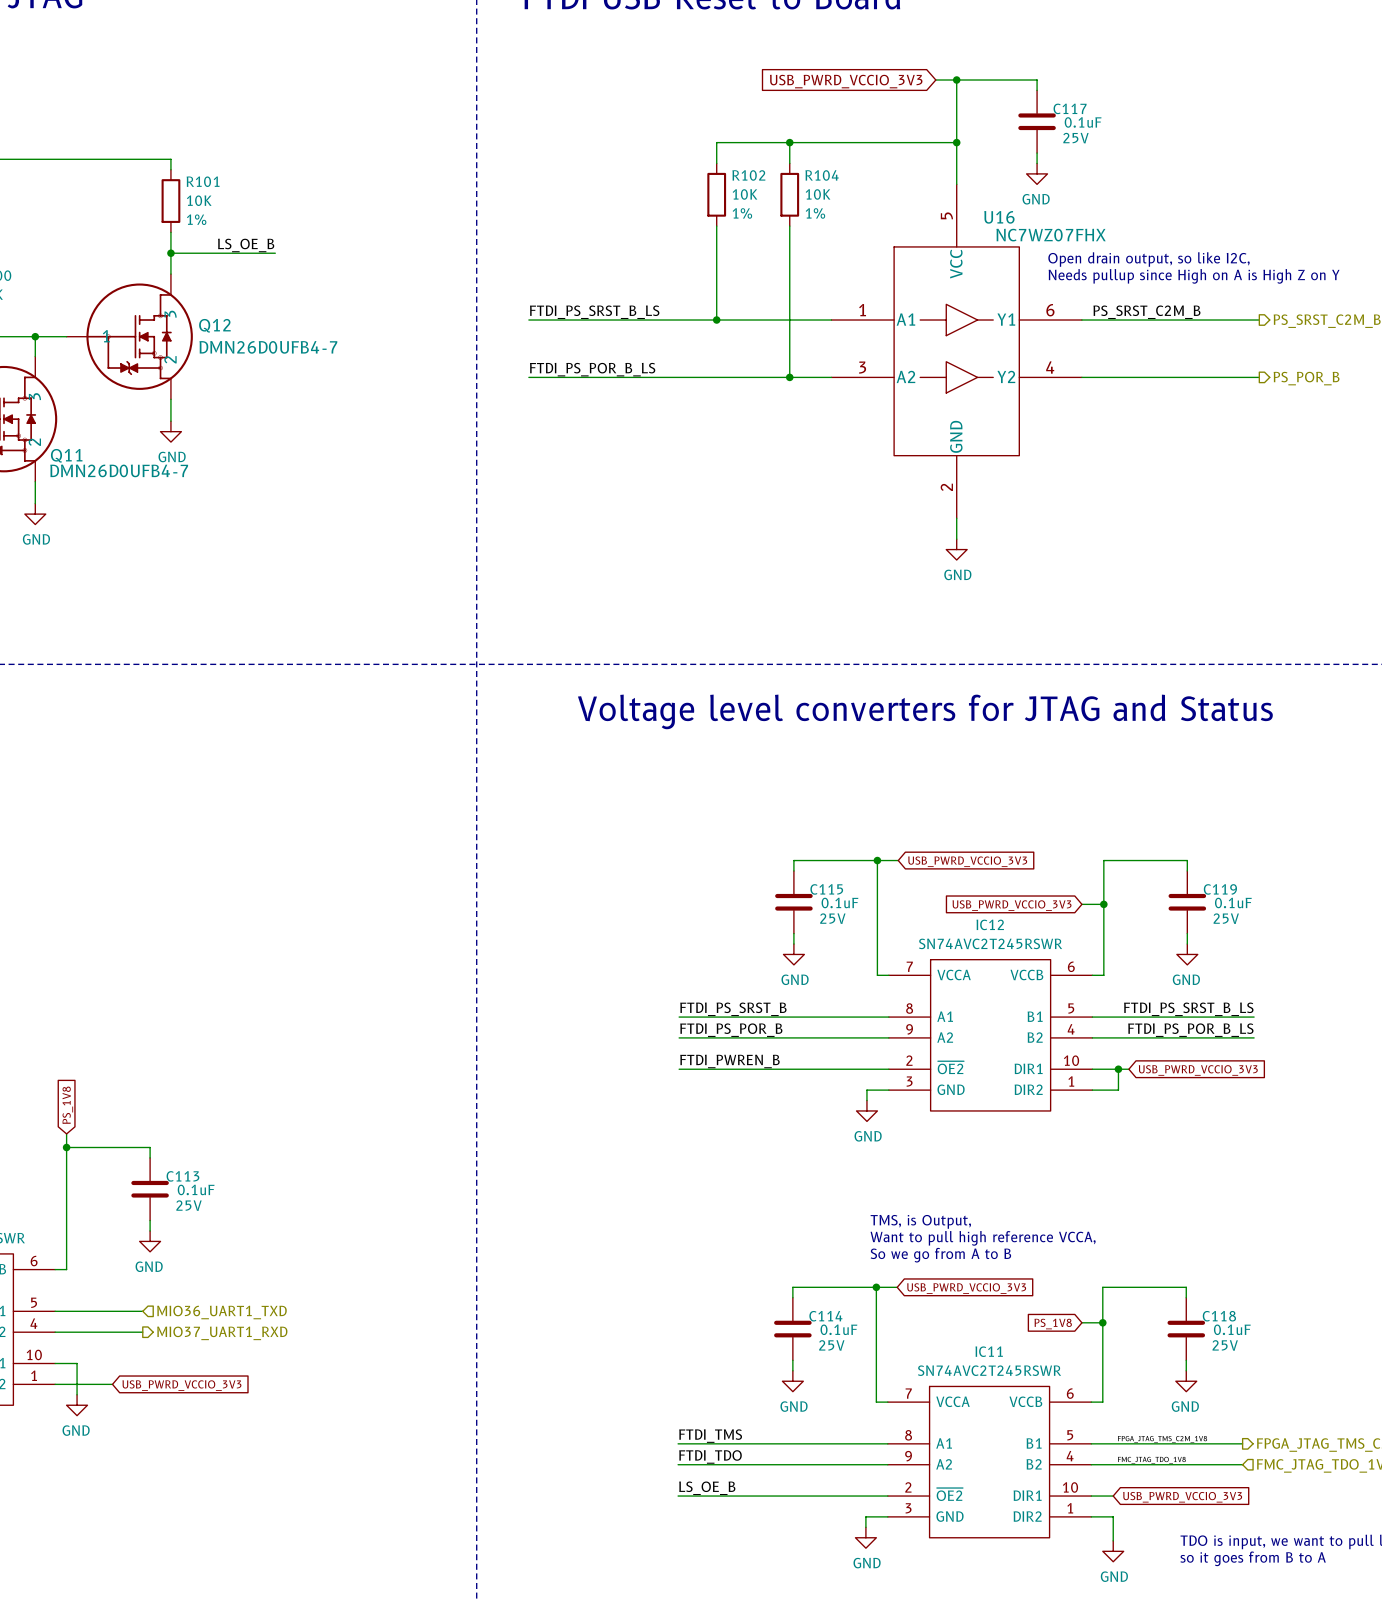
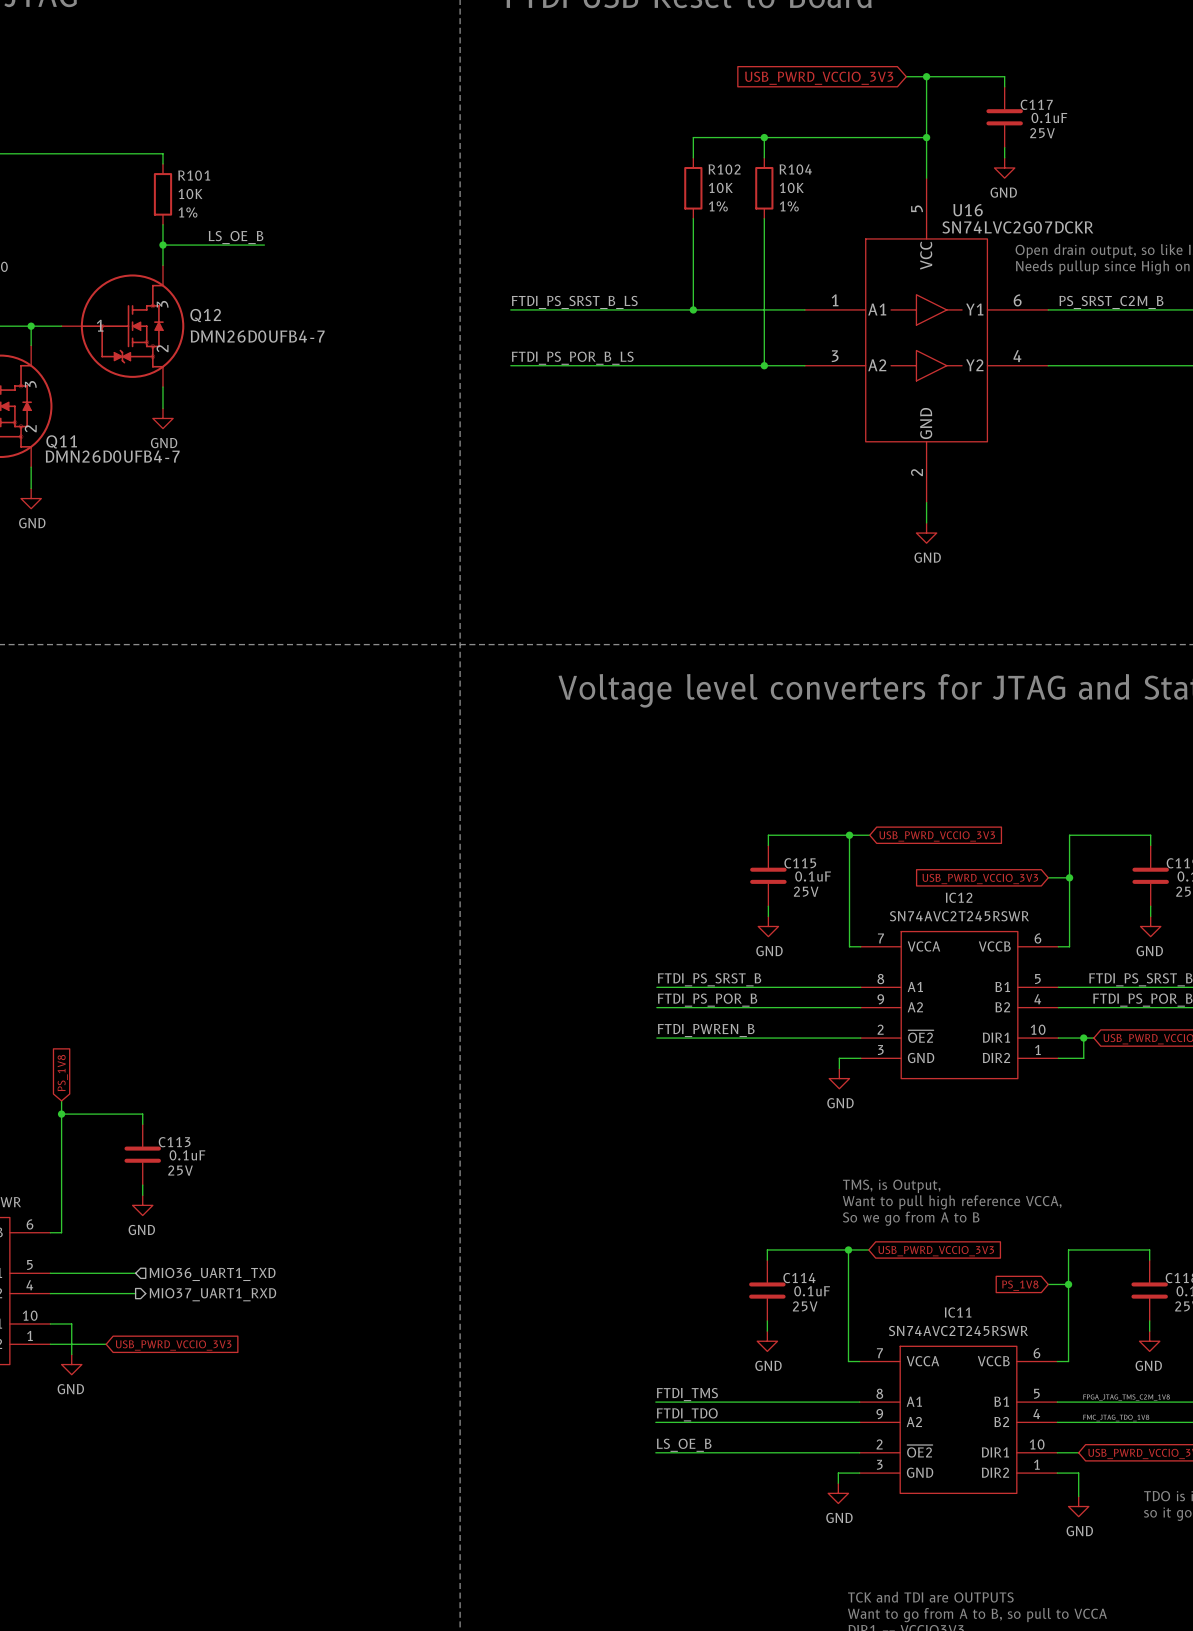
U16 value: NC7WZ07FHX (1051, 235) -> SN74LVC2G07DCKR (1017, 227)

